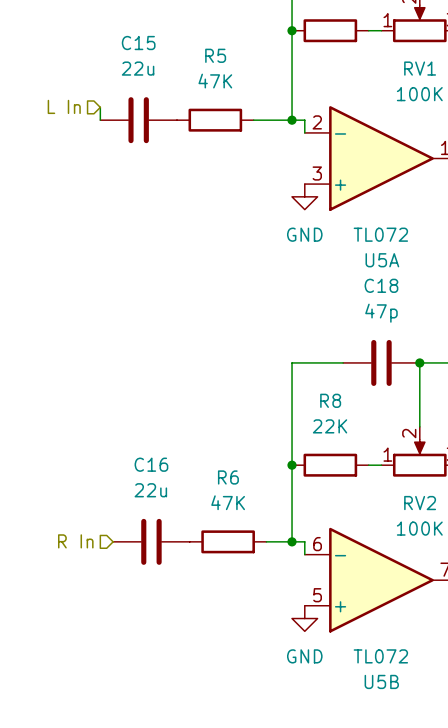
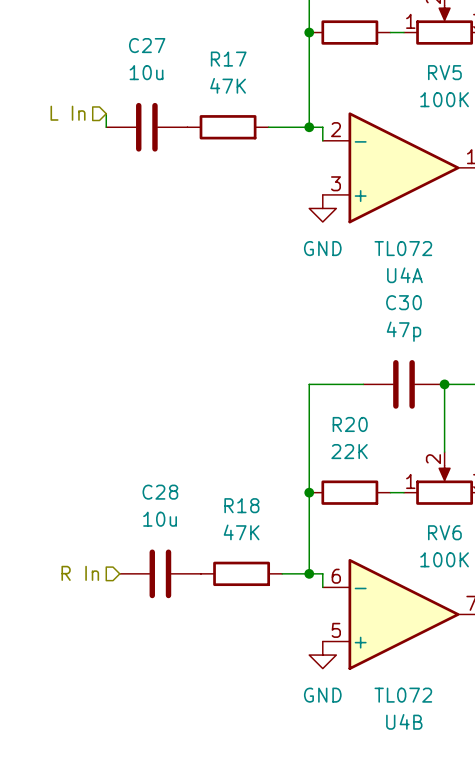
C15 name: C15 (138, 43) -> C27 (147, 45)
R5 name: R5 (215, 55) -> R17 (228, 59)
C15 value: 22u (138, 68) -> 10u (146, 72)
RV1 name: RV1 (420, 68) -> RV5 (444, 72)
U5A name: U5A (382, 260) -> U4A (404, 275)
C18 name: C18 (381, 285) -> C30 (403, 302)
R8 name: R8 (330, 400) -> R20 (350, 424)
C16 name: C16 (151, 464) -> C28 (160, 492)
R6 name: R6 (228, 477) -> R18 (241, 505)
C16 value: 22u (150, 490) -> 10u (160, 519)
RV2 name: RV2 (420, 503) -> RV6 (444, 532)
U5B name: U5B (381, 681) -> U4B (404, 721)

